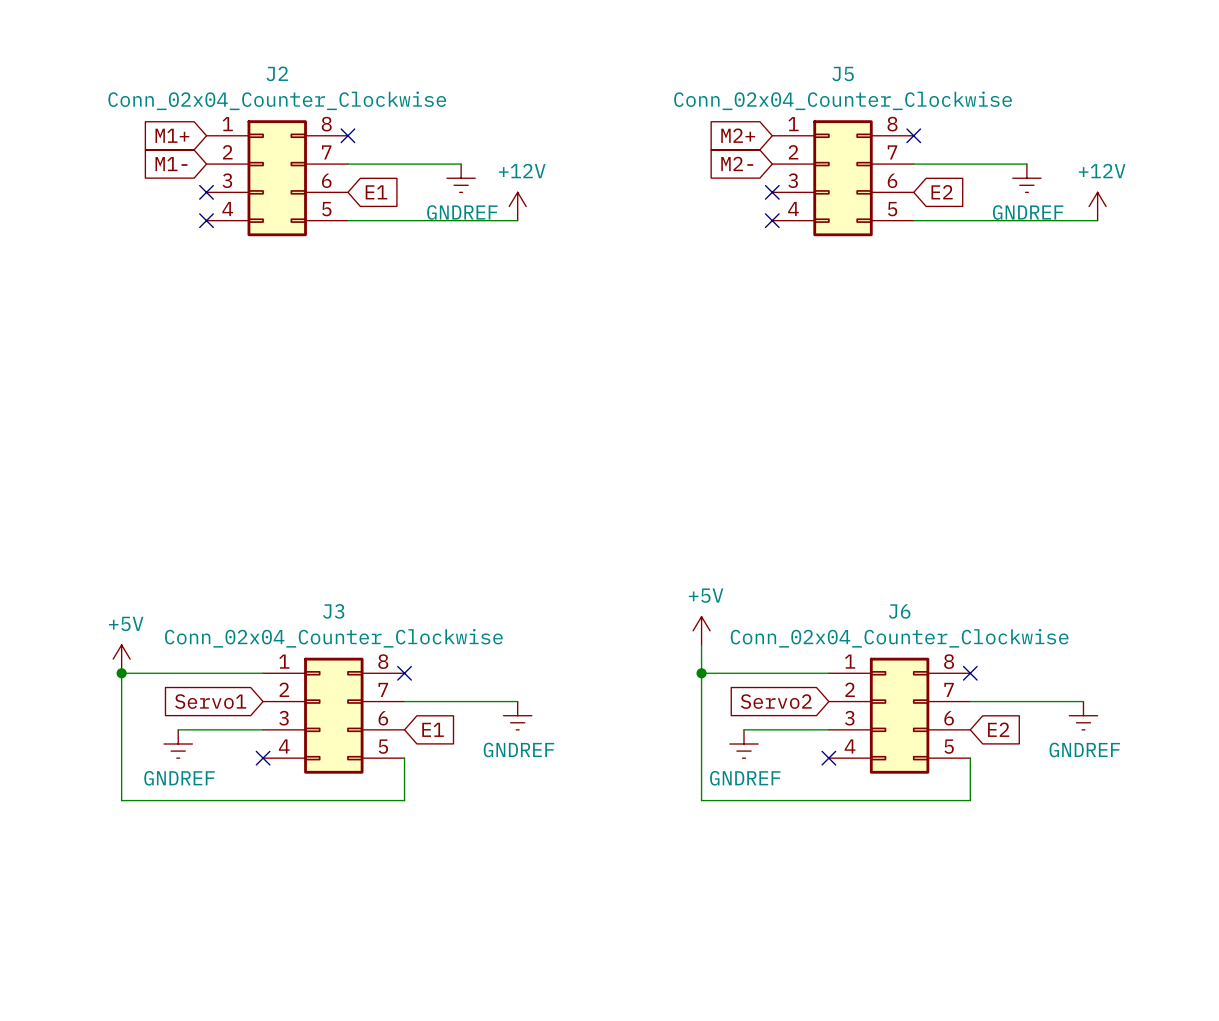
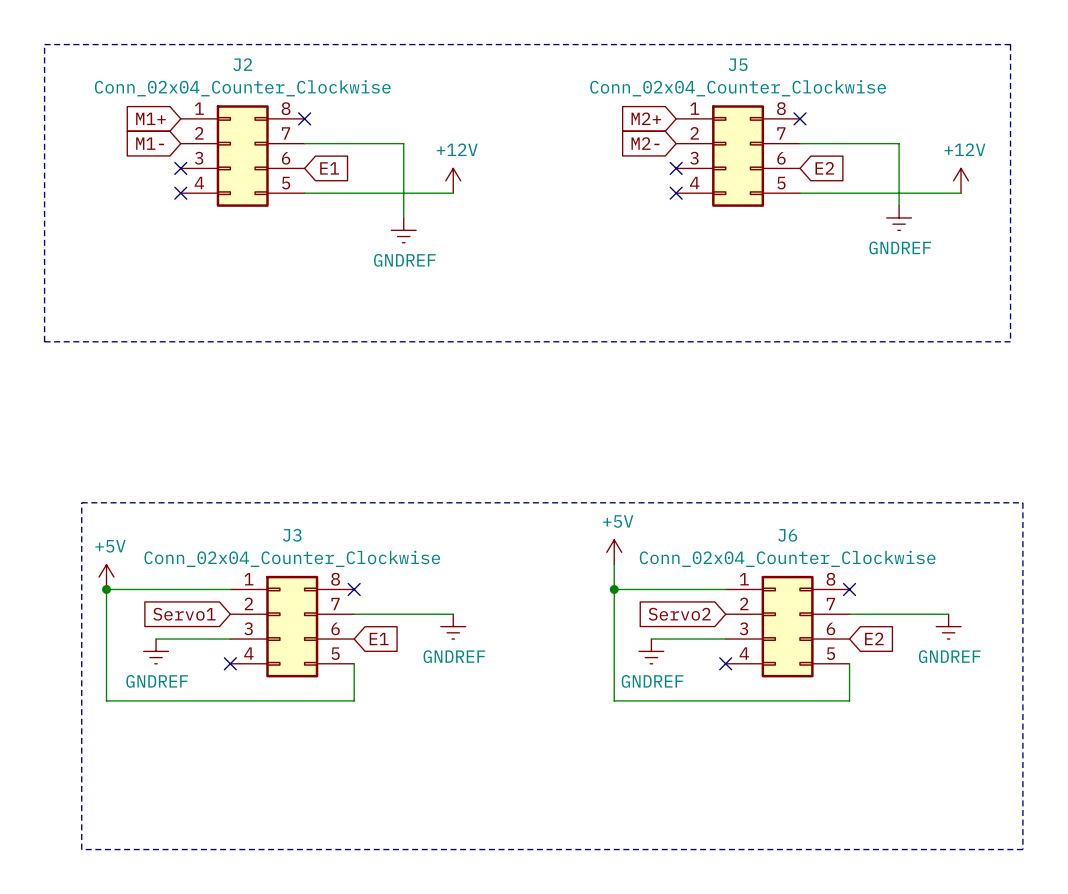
line: none -> (44, 44) (44, 341) (1010, 341) (1010, 44) (44, 44)
wire: none -> (403, 143) (403, 217)
wire: none -> (899, 143) (899, 205)
power symbol position: GNDREF (461, 178) -> GNDREF (403, 230)
power symbol position: GNDREF (1026, 178) -> GNDREF (899, 217)
line: none -> (81, 502) (1022, 502) (1022, 849) (81, 849) (81, 502)

